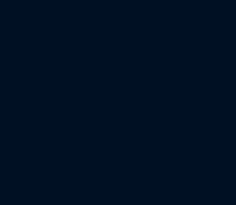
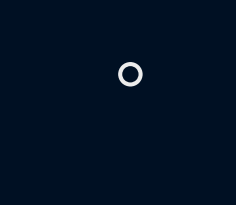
via: none -> (130, 74)

